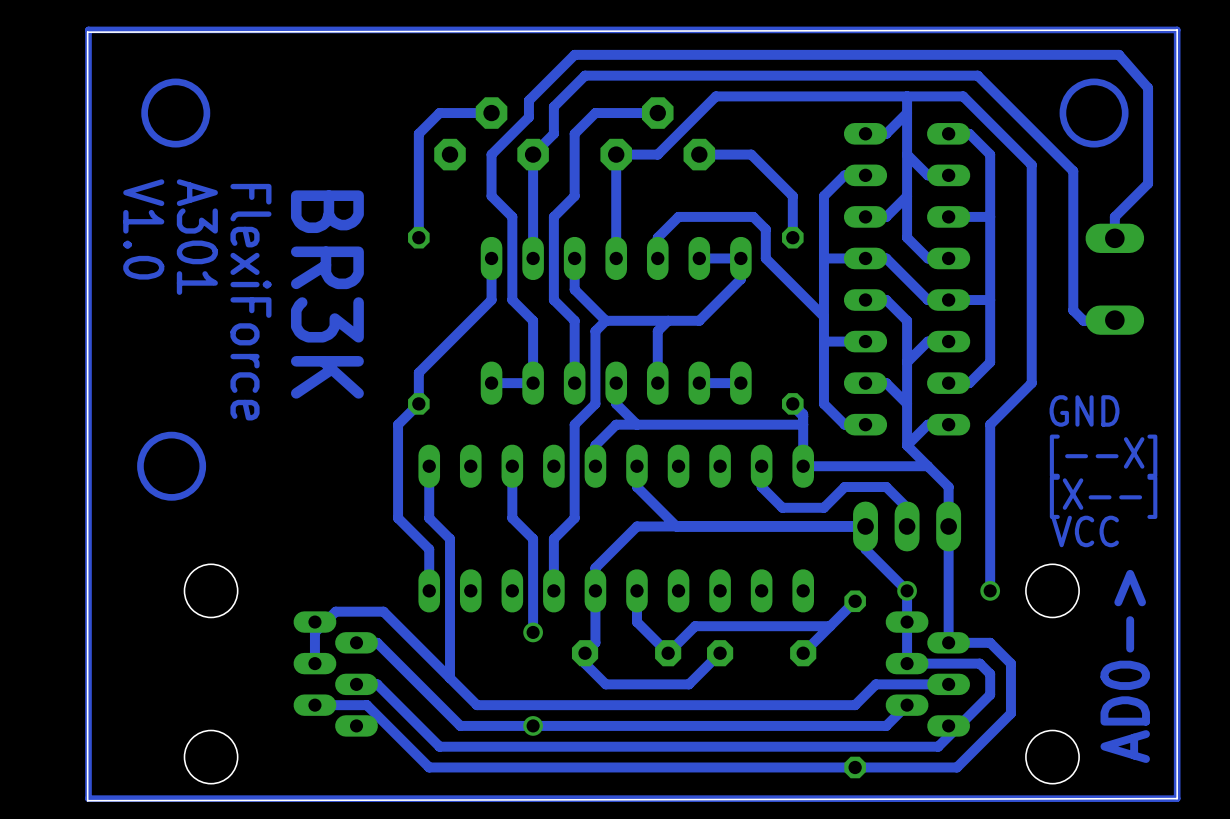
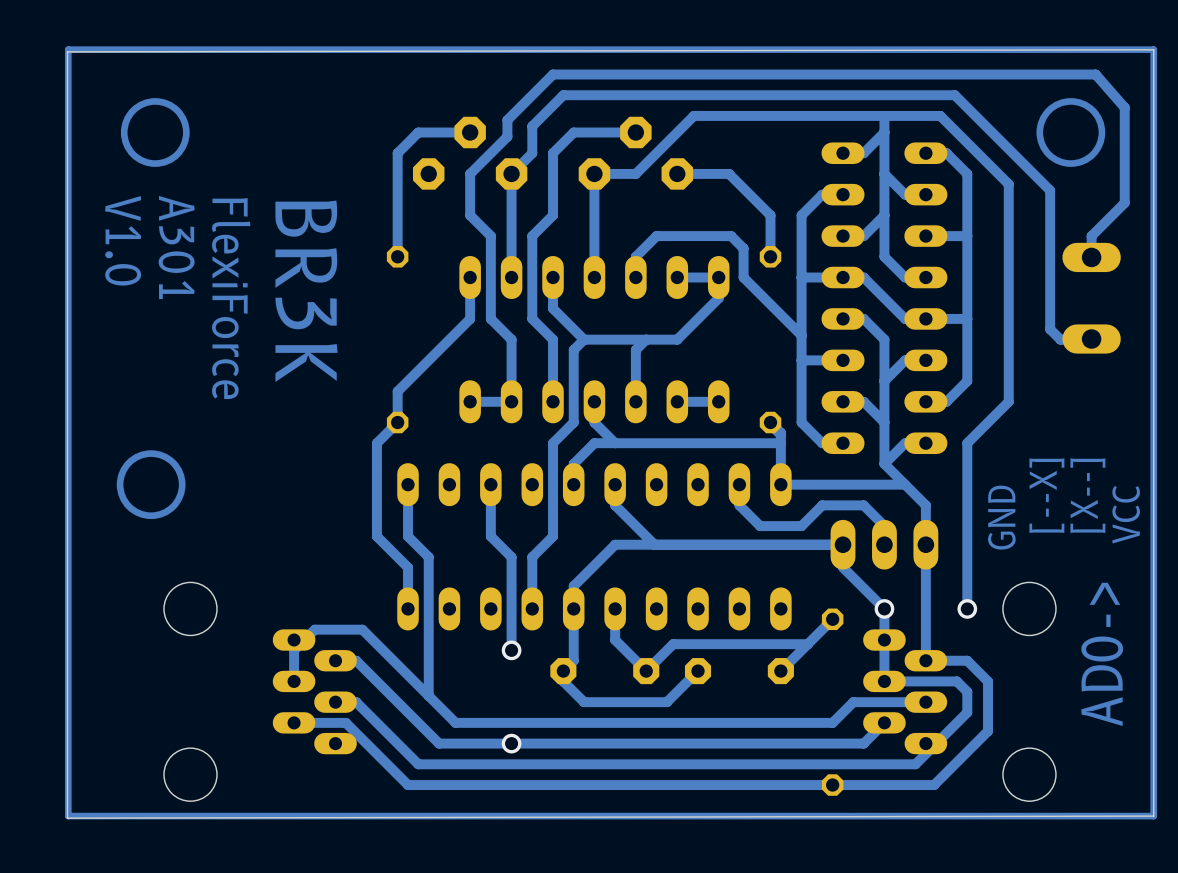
text: GND (1084, 410) -> [--X] (1046, 495)
text: [--X] (1103, 456) -> none
text rotation: 0° (1103, 497) -> 90° counterclockwise (1087, 495)
text: none -> GND (1001, 517)
text rotation: 0° (1085, 531) -> 90° counterclockwise (1126, 514)

